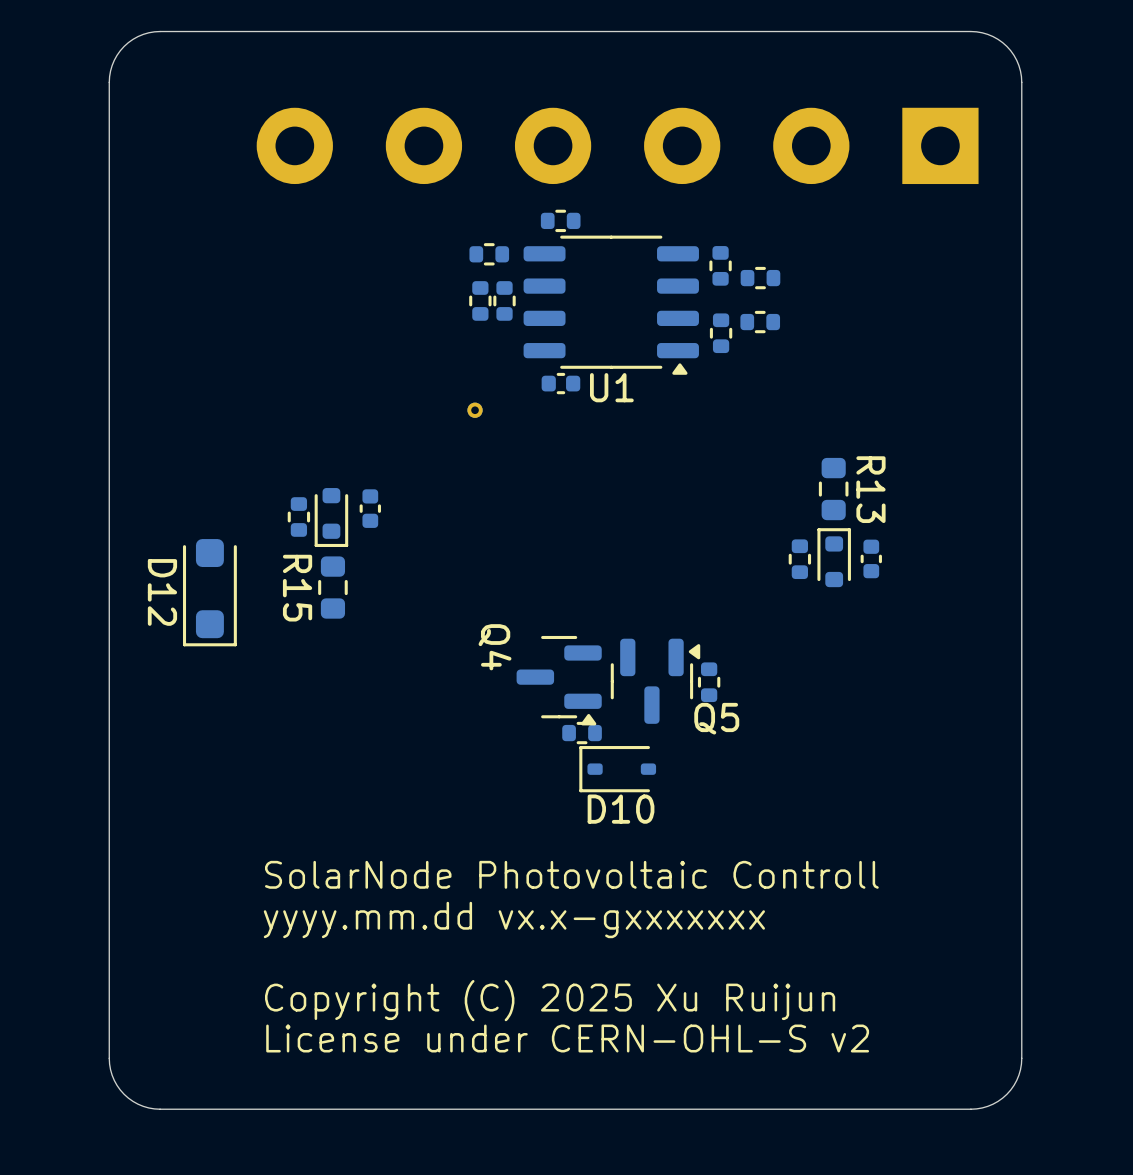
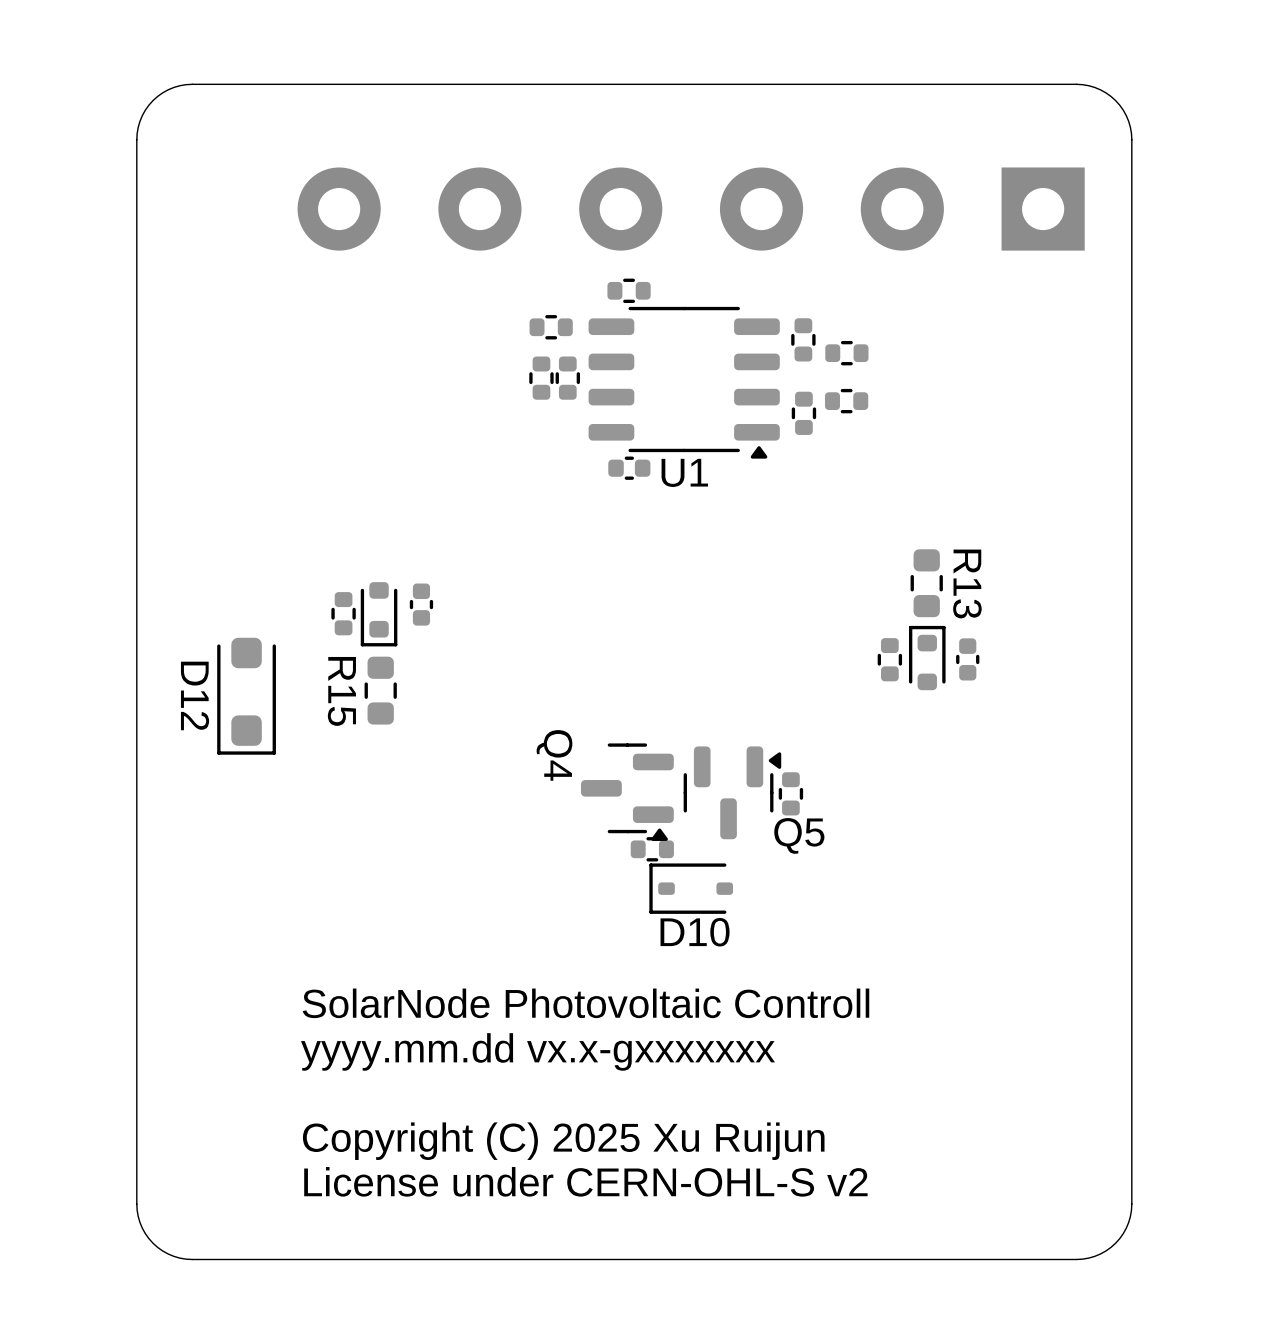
part: (475, 410) -> none

